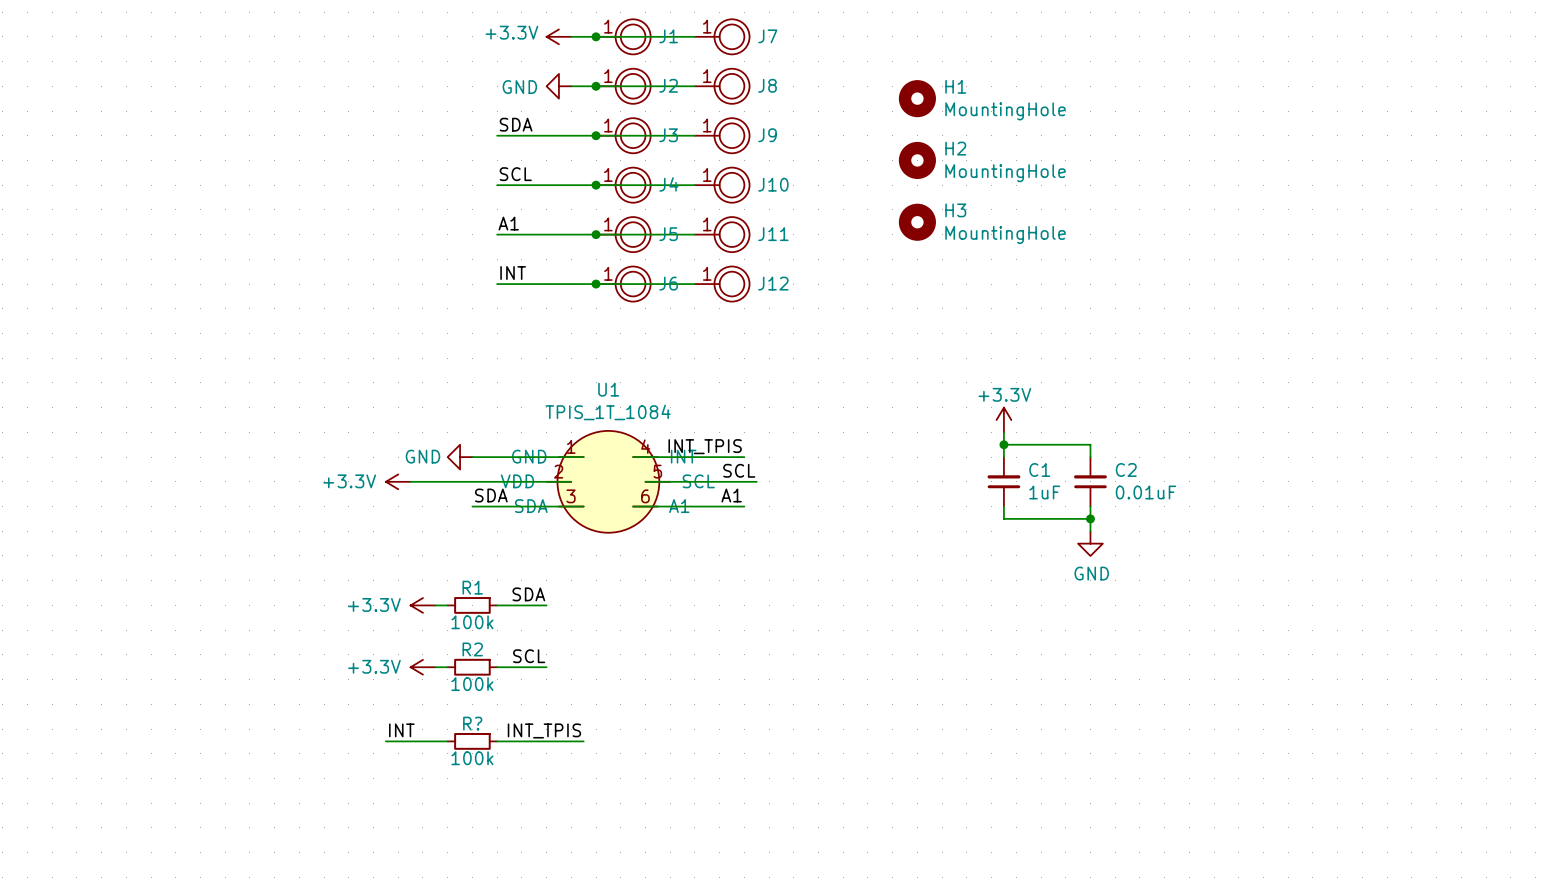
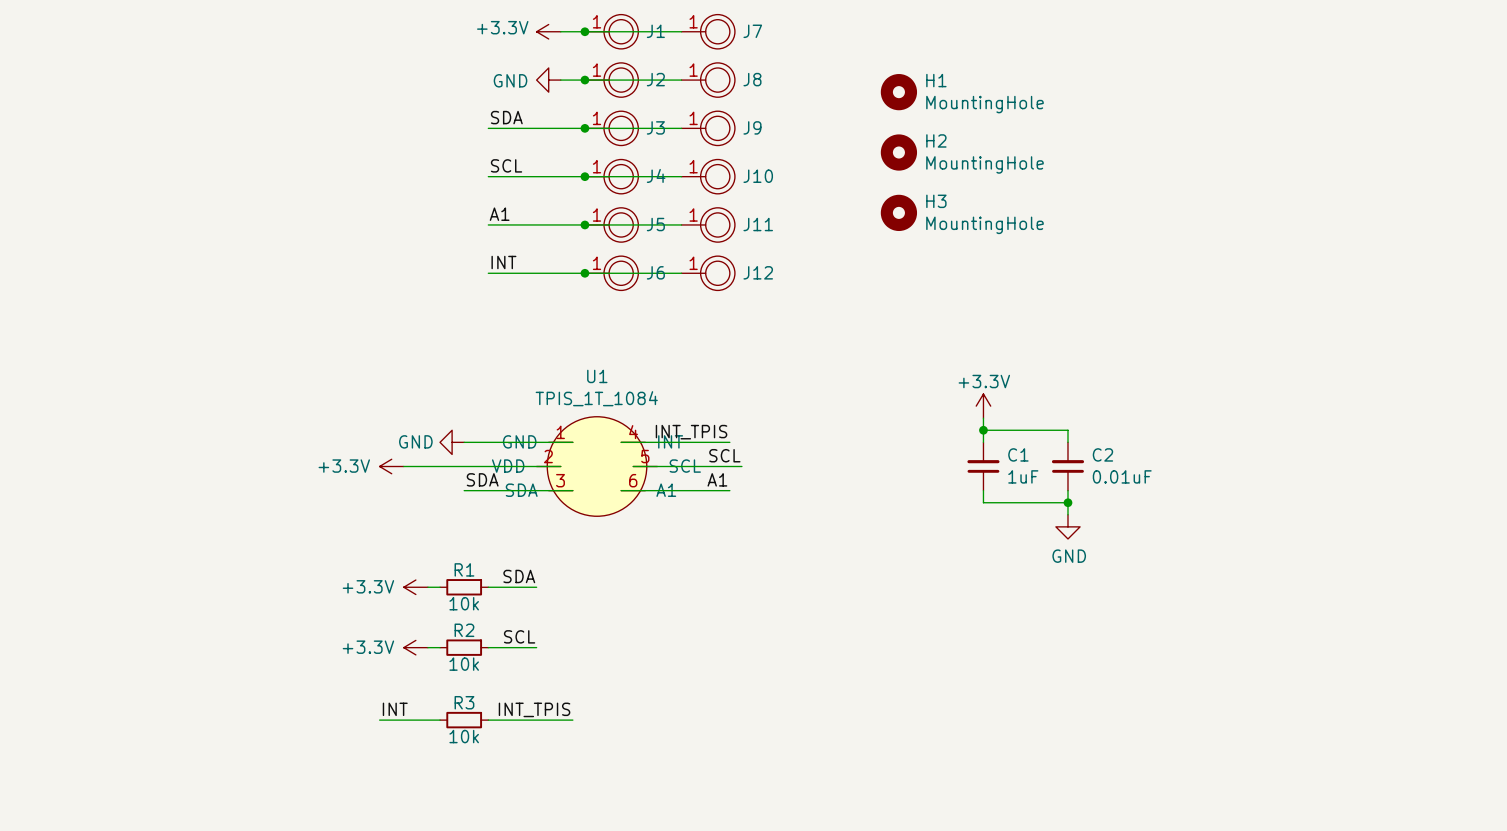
R1 value: 100k (472, 622) -> 10k (464, 603)
R2 value: 100k (472, 684) -> 10k (464, 664)
R? name: R? (472, 723) -> R3 (464, 702)
R? value: 100k (472, 758) -> 10k (464, 736)

